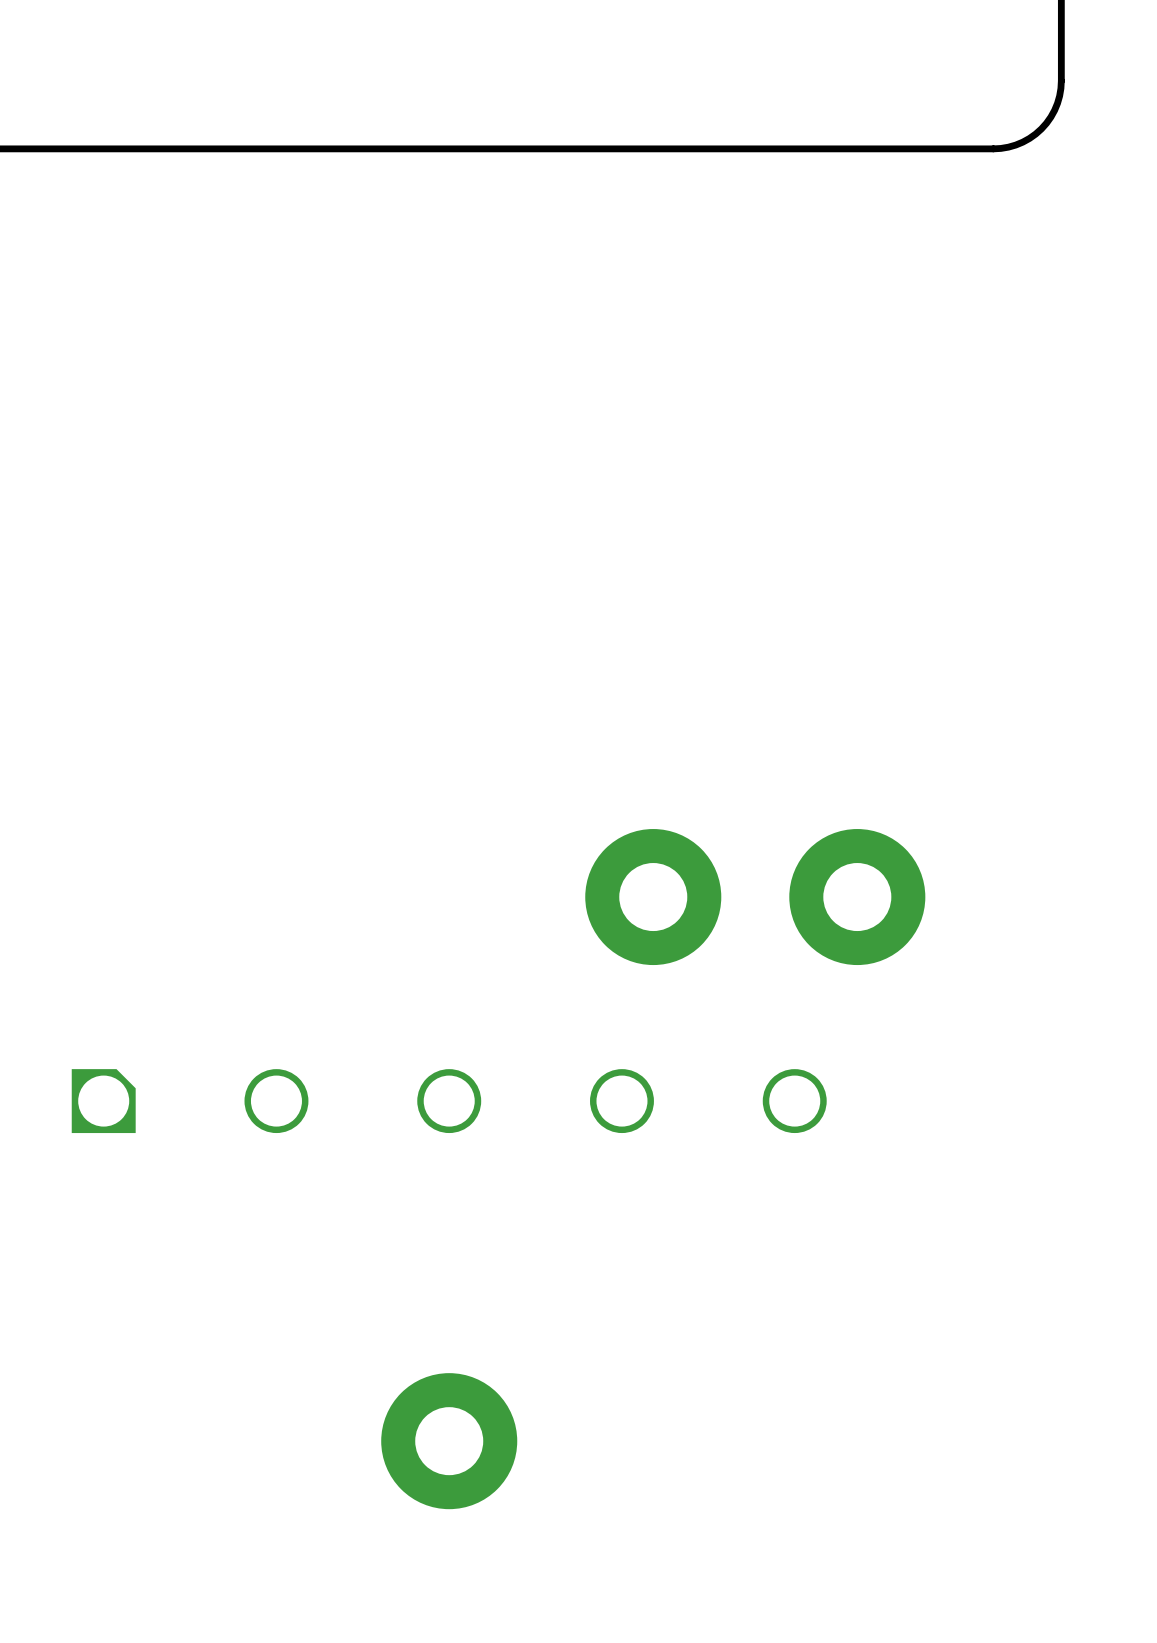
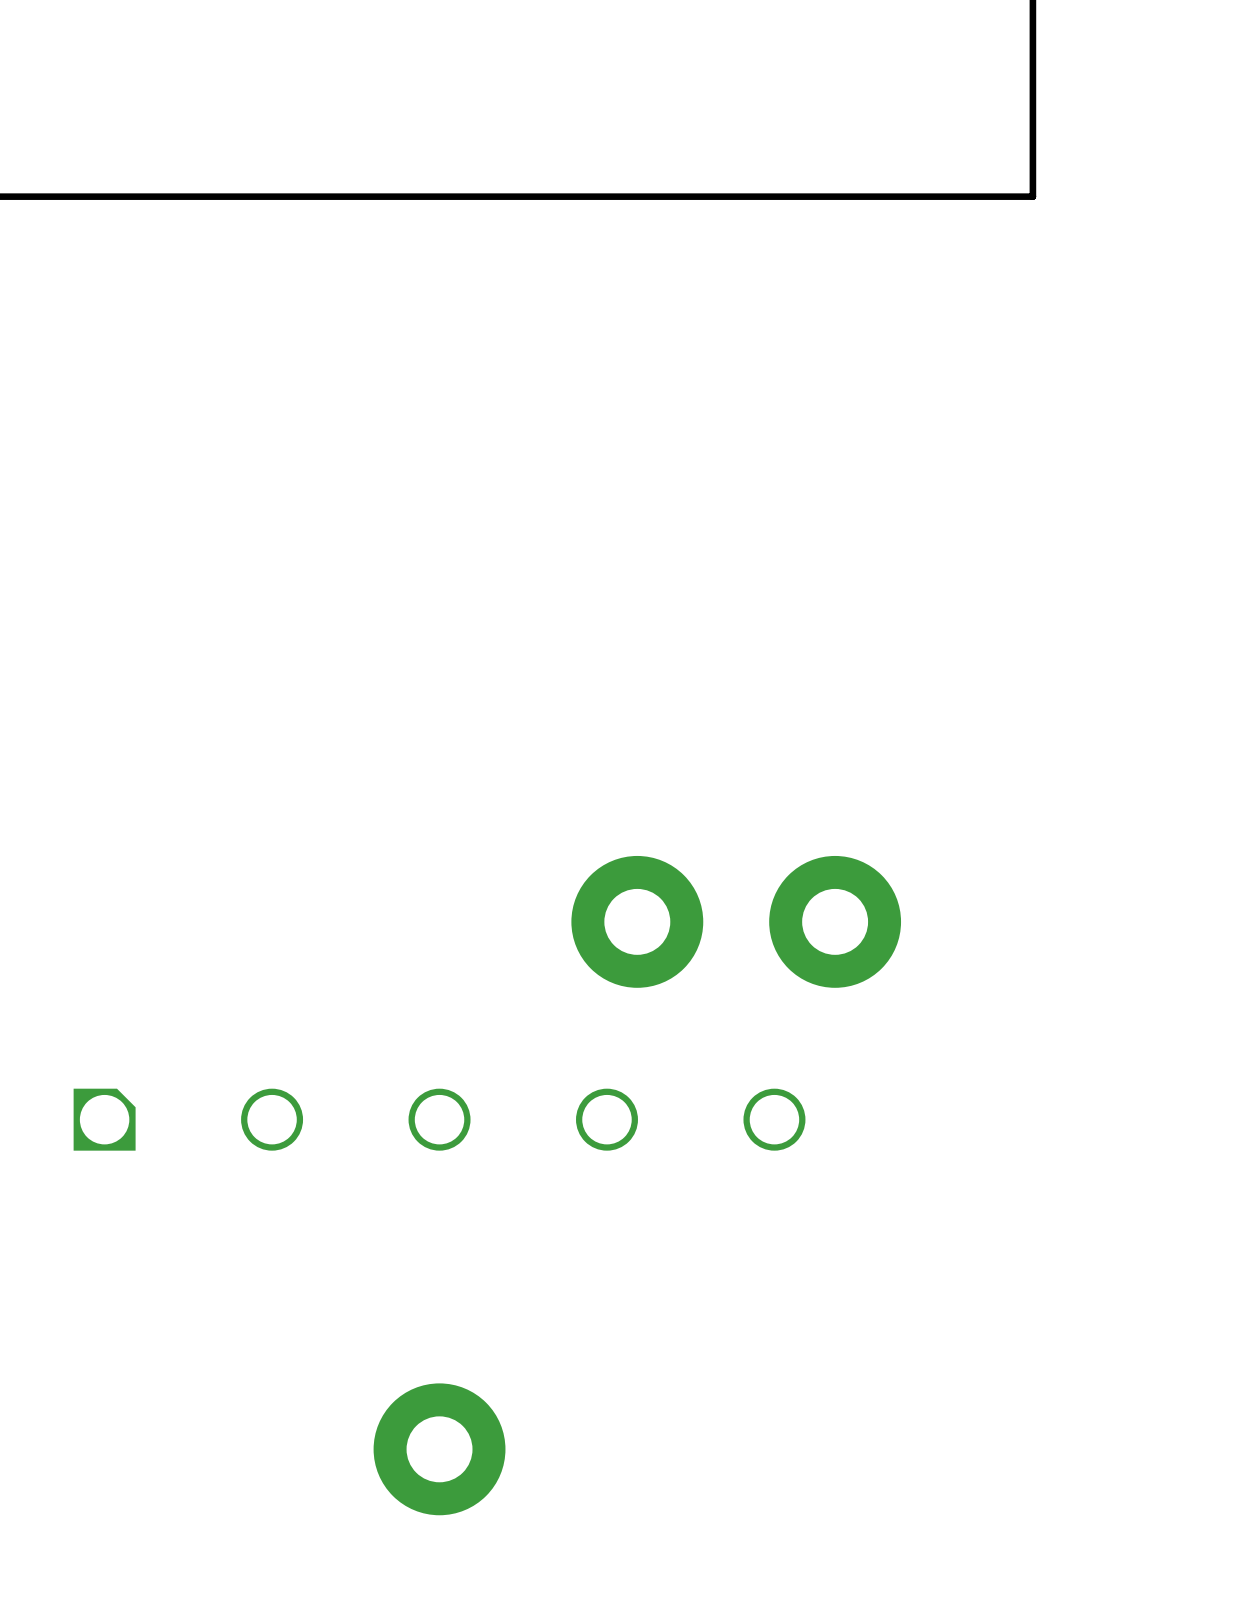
board edge: (1061, 80) (1057, 103) (1050, 117) (1041, 128) (1022, 142) (1008, 147) (993, 148) -> (1032, 130) (1032, 196) (966, 196)

